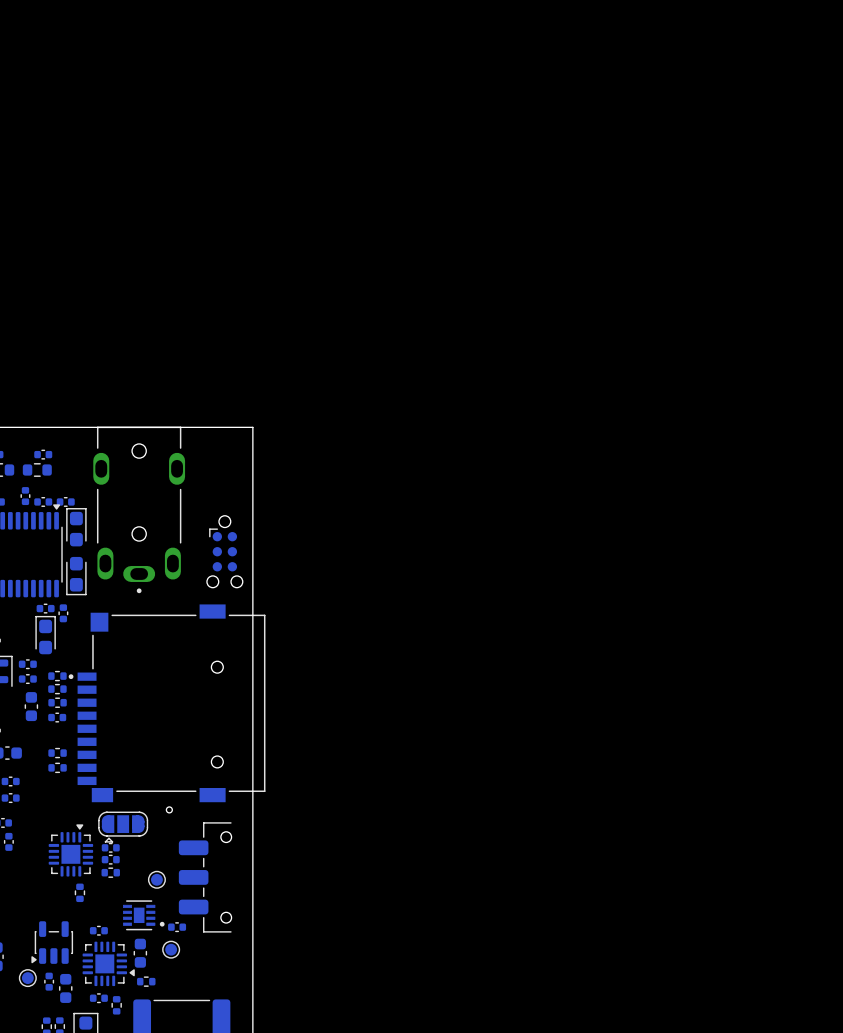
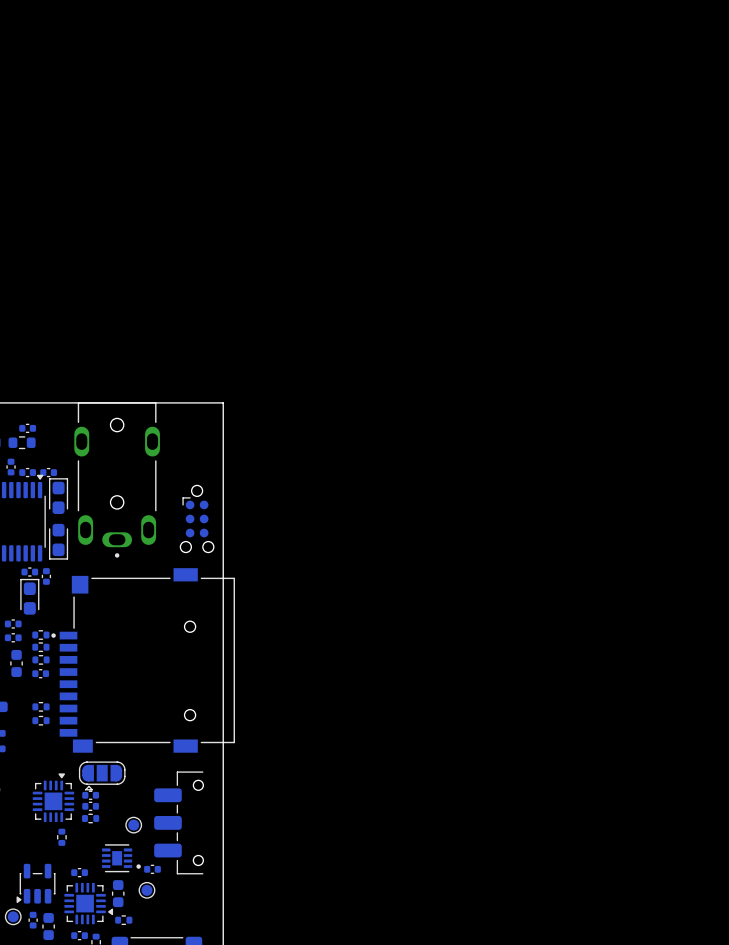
part: (169, 809) -> none

